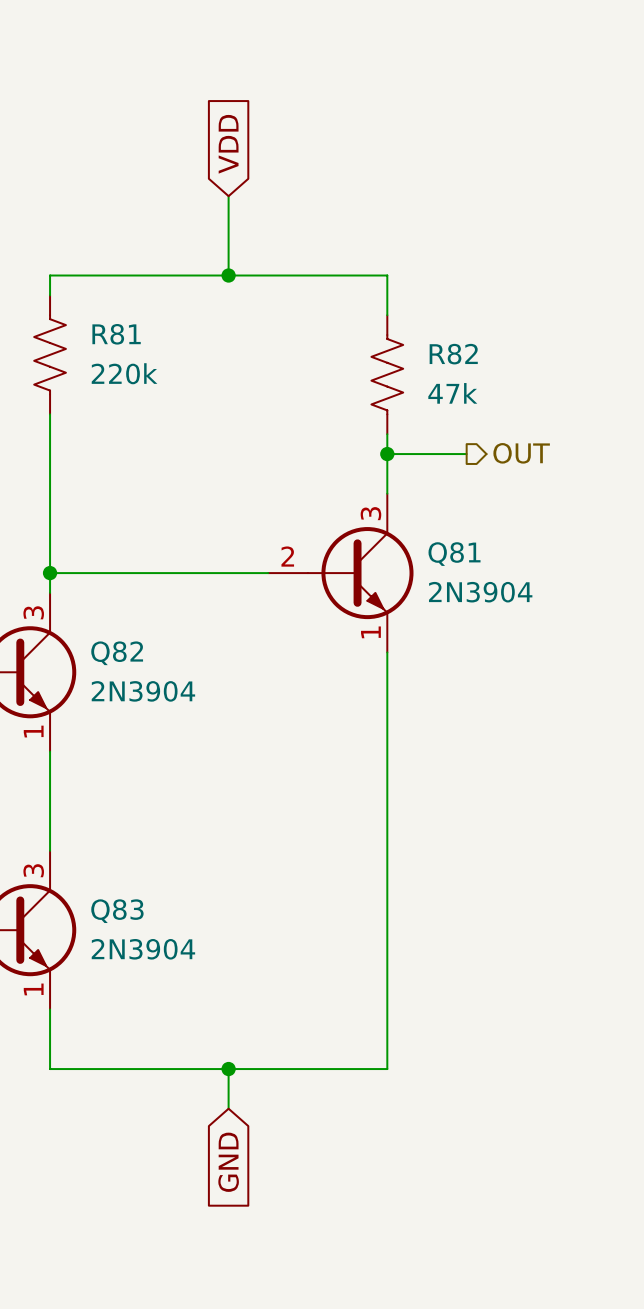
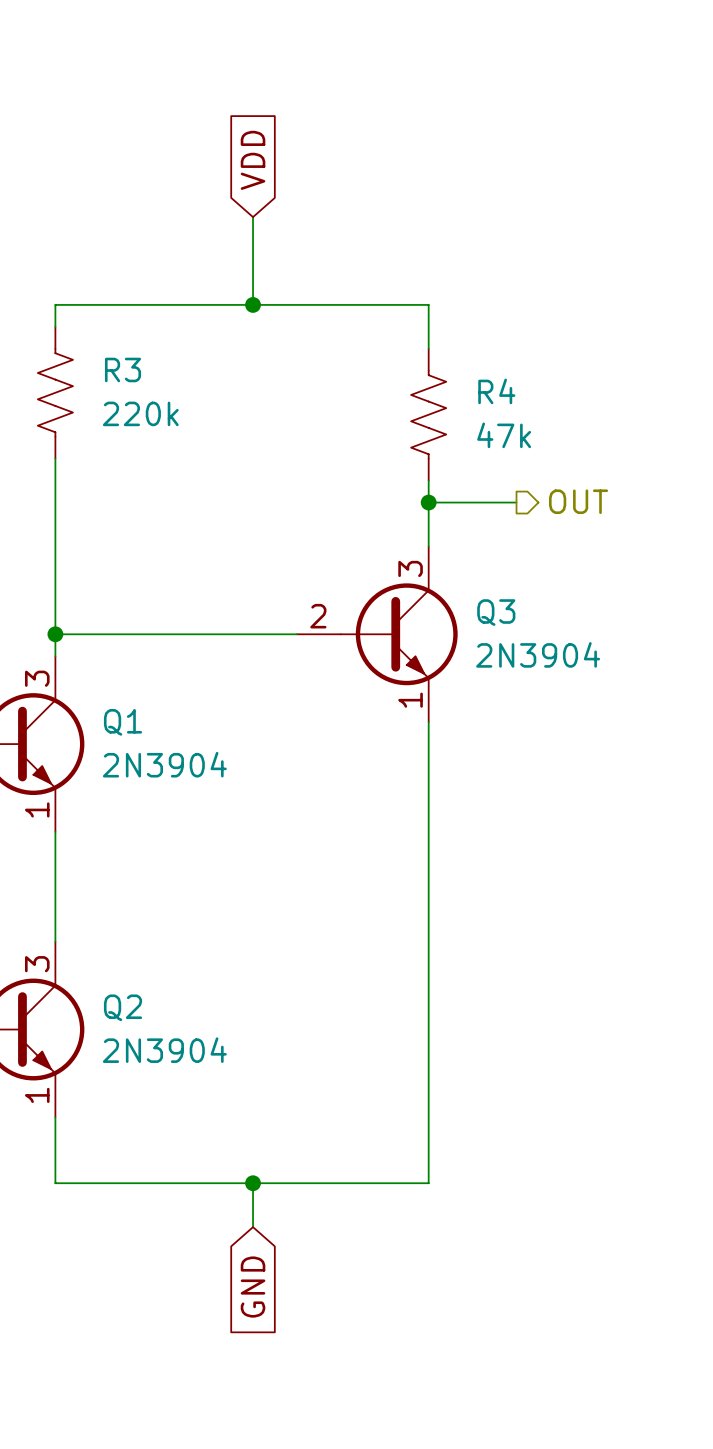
R81 name: R81 (116, 334) -> R3 (123, 369)
R82 name: R82 (453, 354) -> R4 (496, 391)
Q81 name: Q81 (454, 554) -> Q3 (496, 612)
Q82 name: Q82 (117, 653) -> Q1 (123, 722)
Q83 name: Q83 (117, 911) -> Q2 (123, 1007)

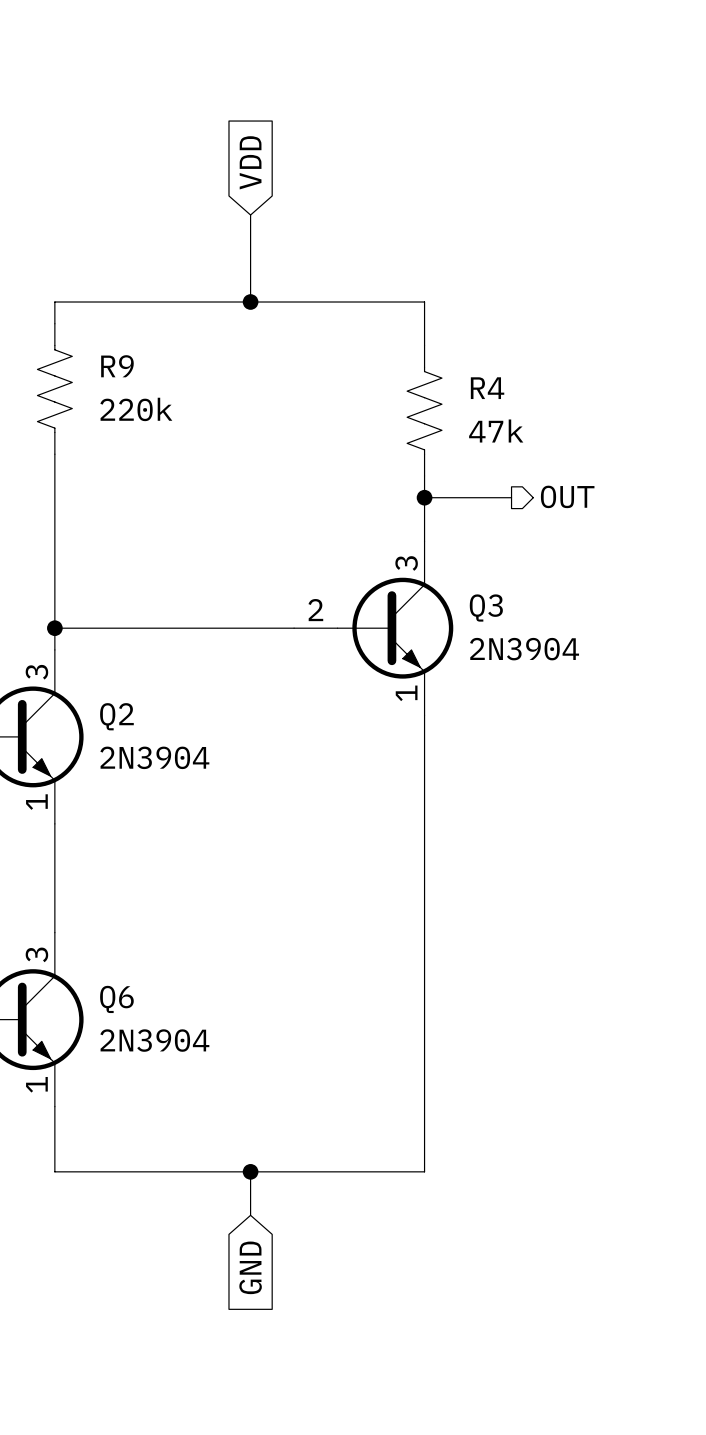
R3 name: R3 (123, 369) -> R9 (117, 366)
Q1 name: Q1 (123, 722) -> Q2 (116, 716)
Q2 name: Q2 (123, 1007) -> Q6 (116, 999)

